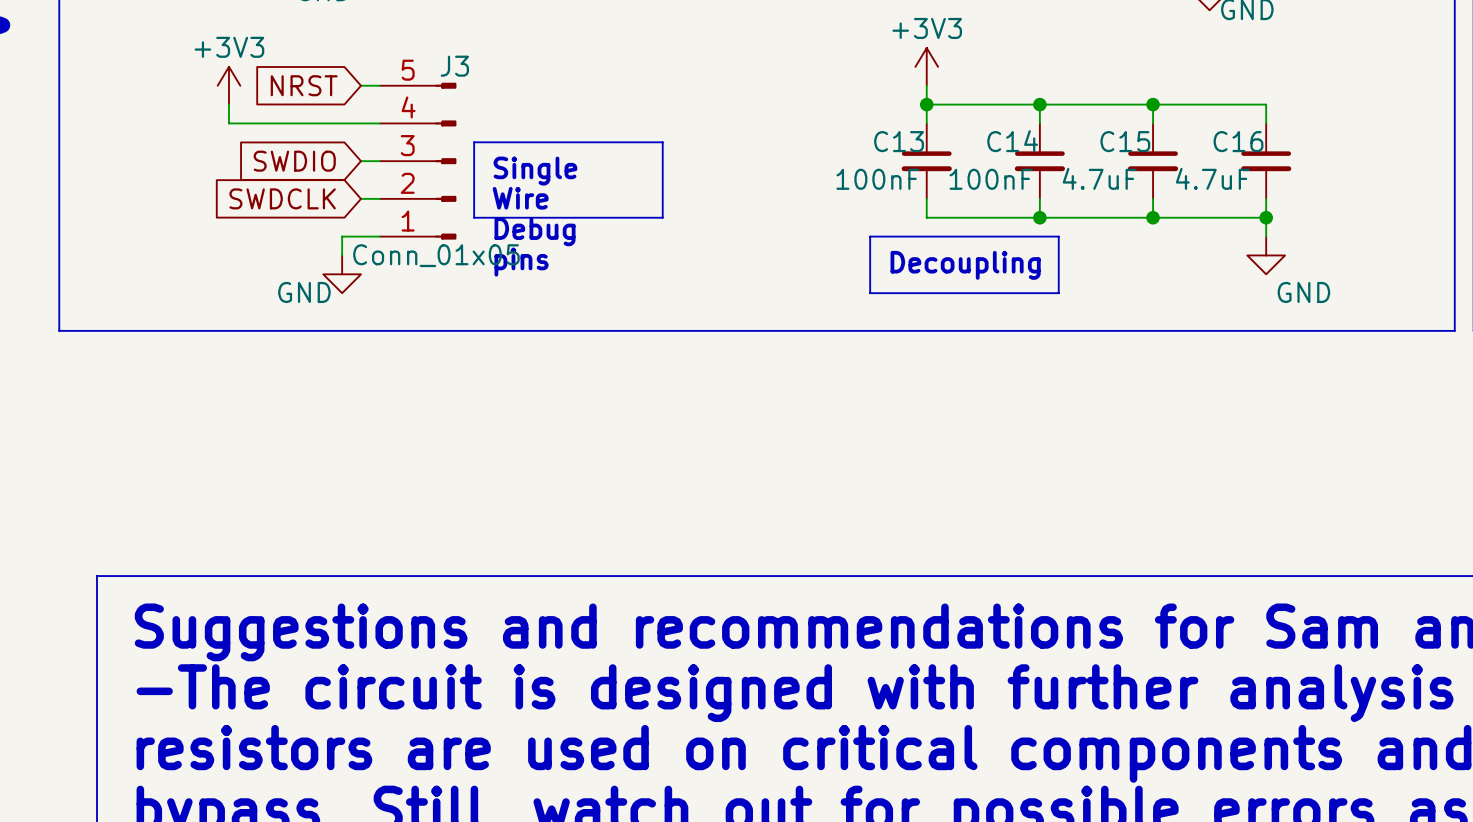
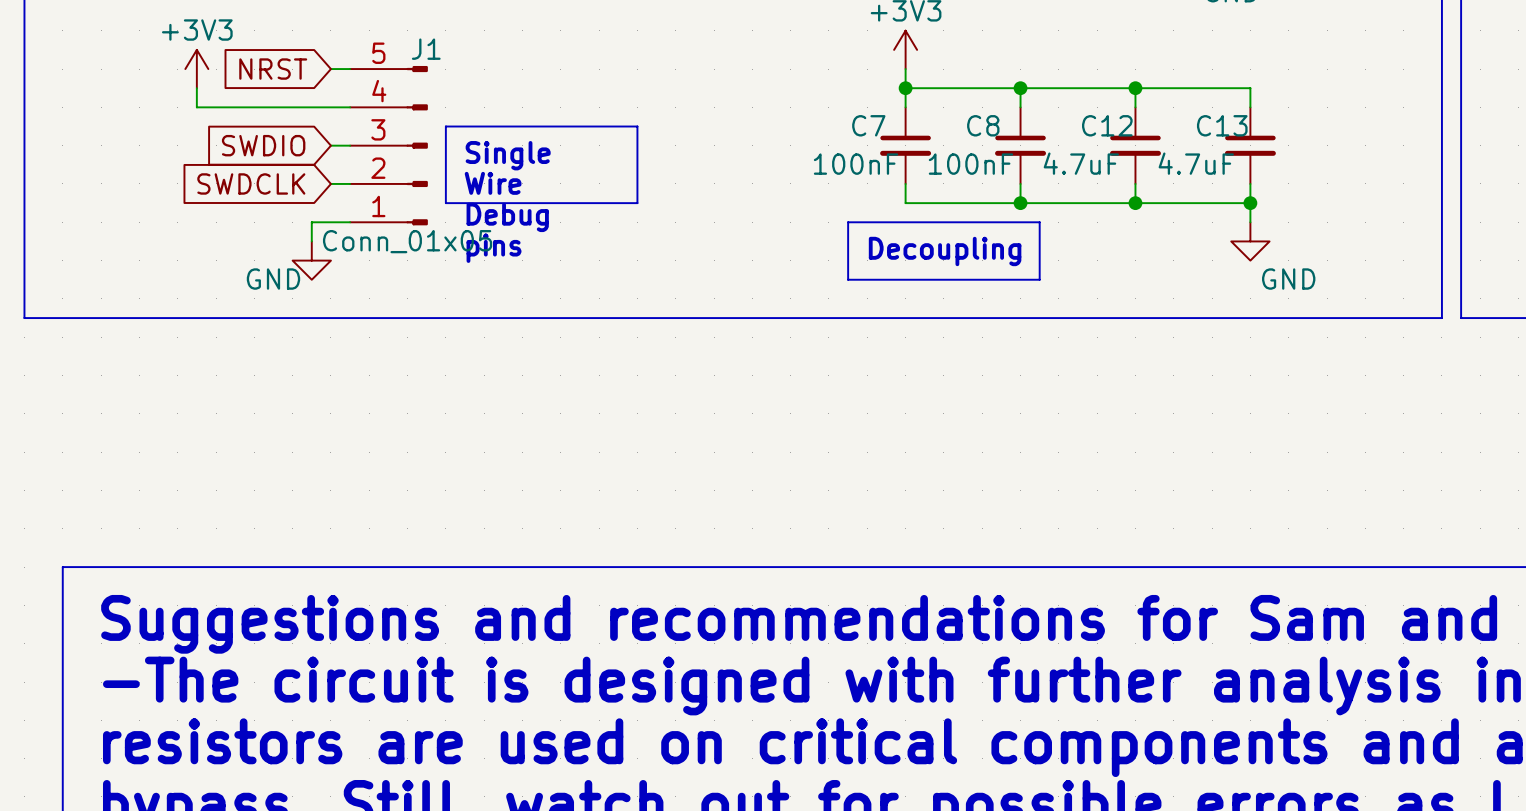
J3 name: J3 (454, 66) -> J1 (426, 49)
C13 name: C13 (899, 141) -> C7 (868, 125)
C14 name: C14 (1012, 141) -> C8 (983, 125)
C15 name: C15 (1125, 141) -> C12 (1107, 125)
C16 name: C16 (1238, 141) -> C13 (1222, 125)

